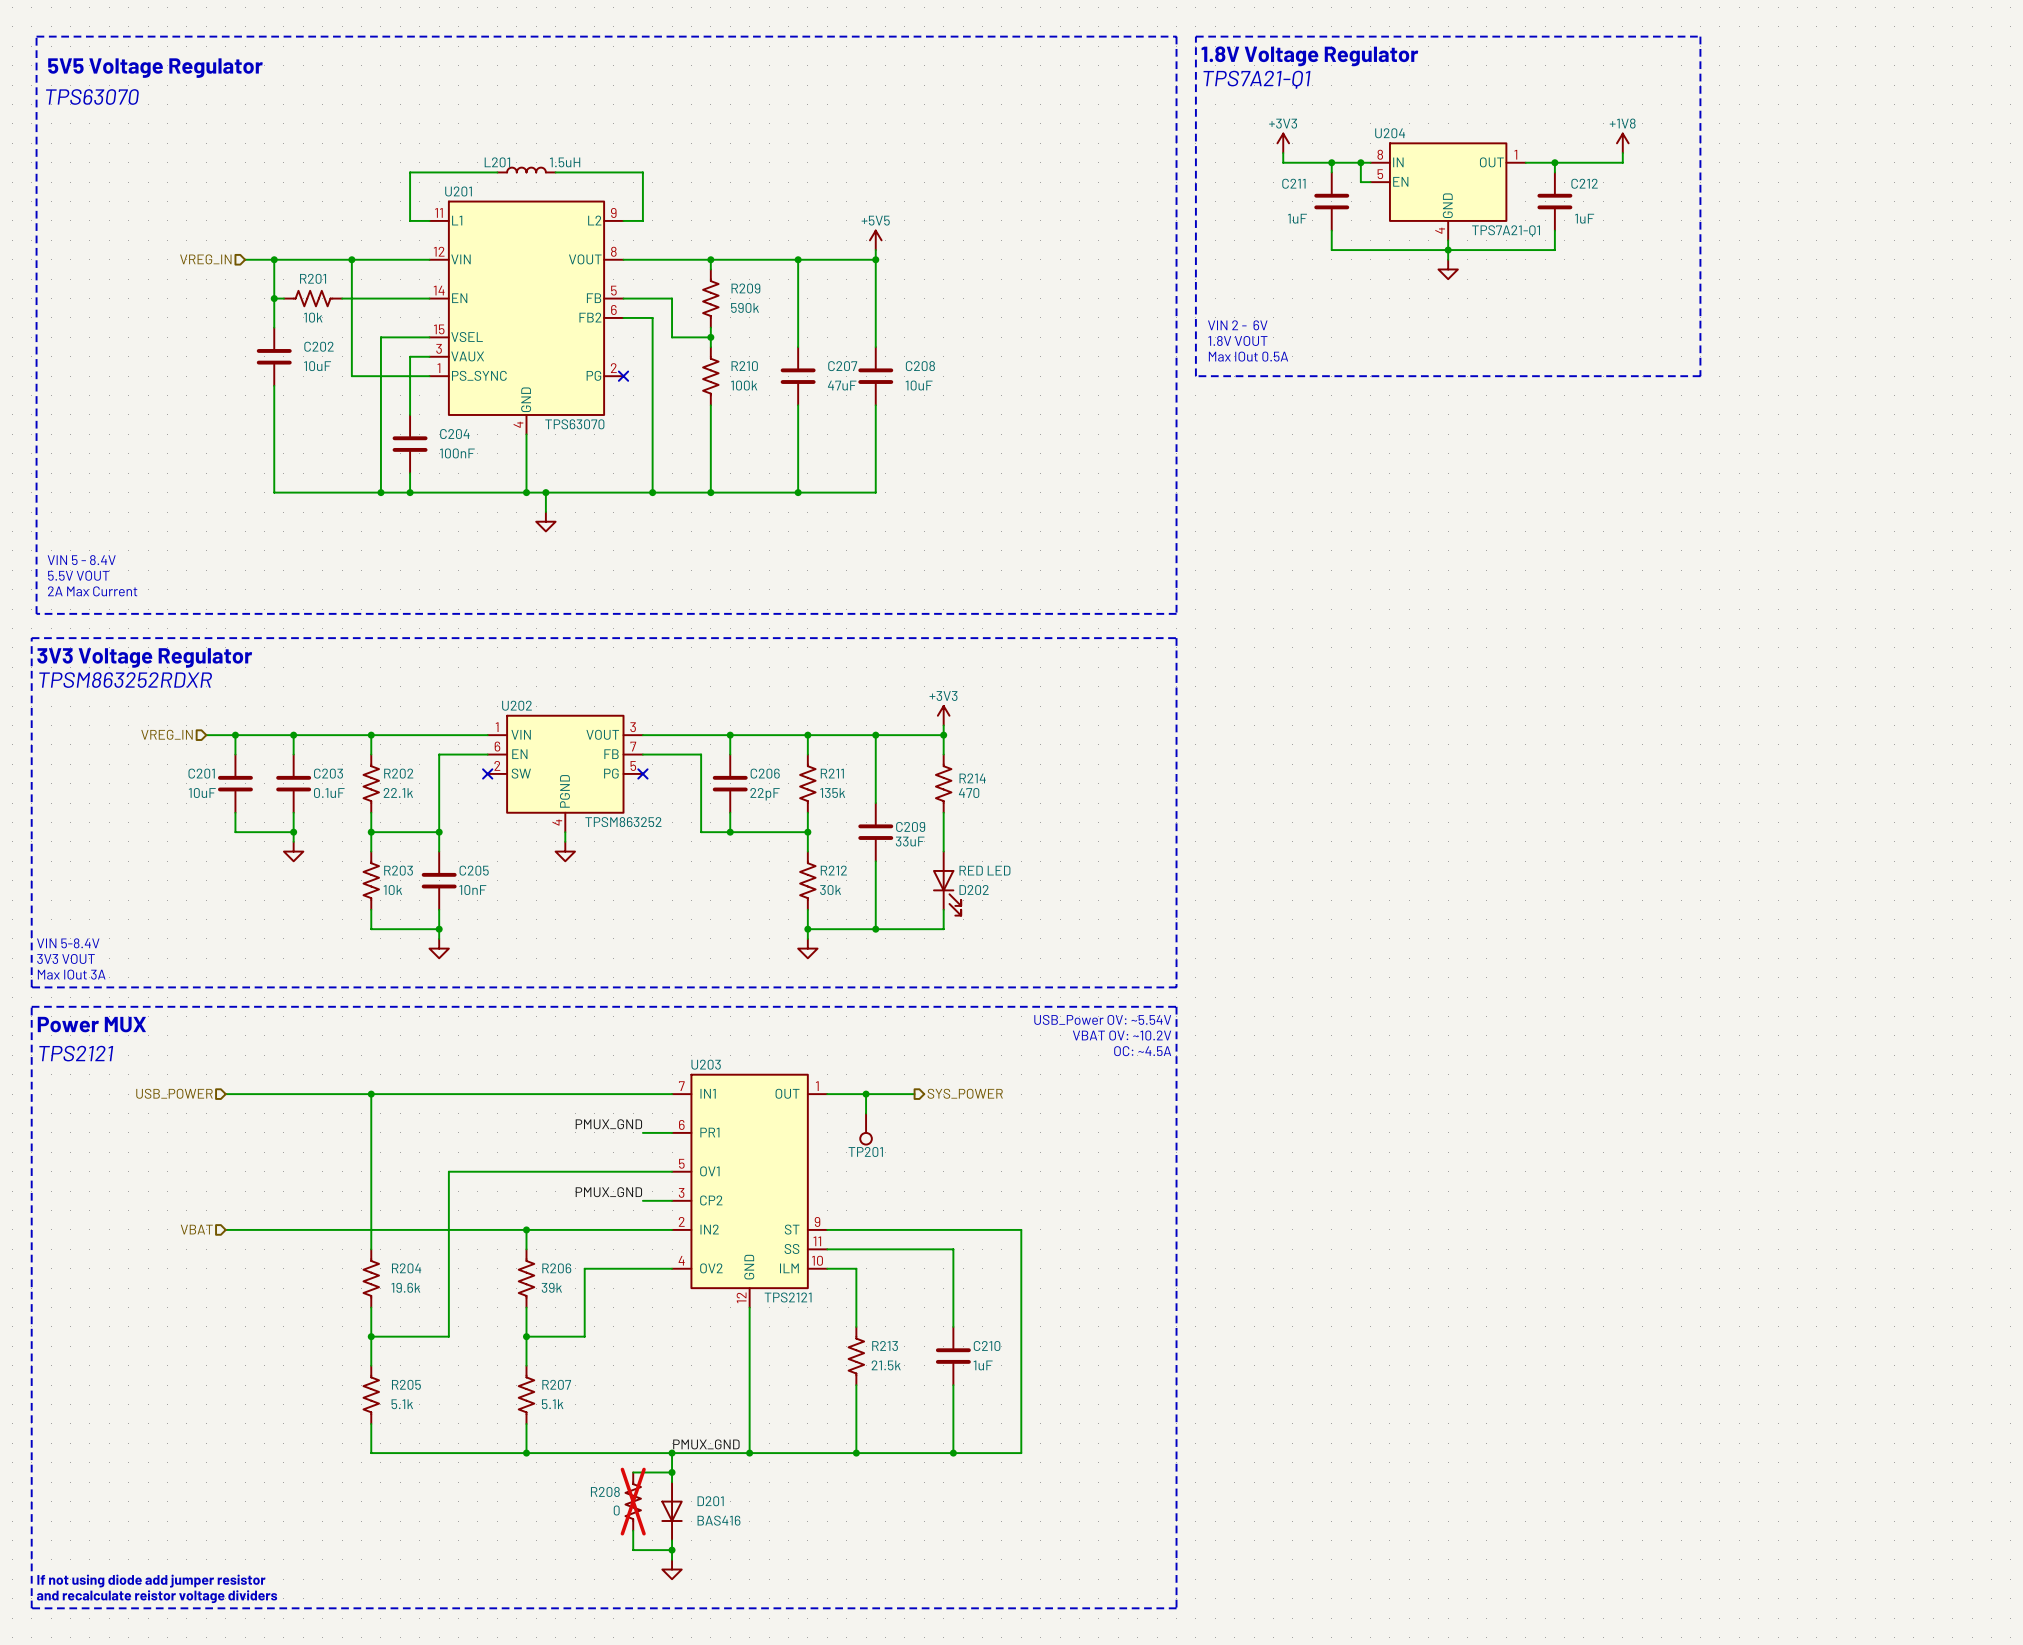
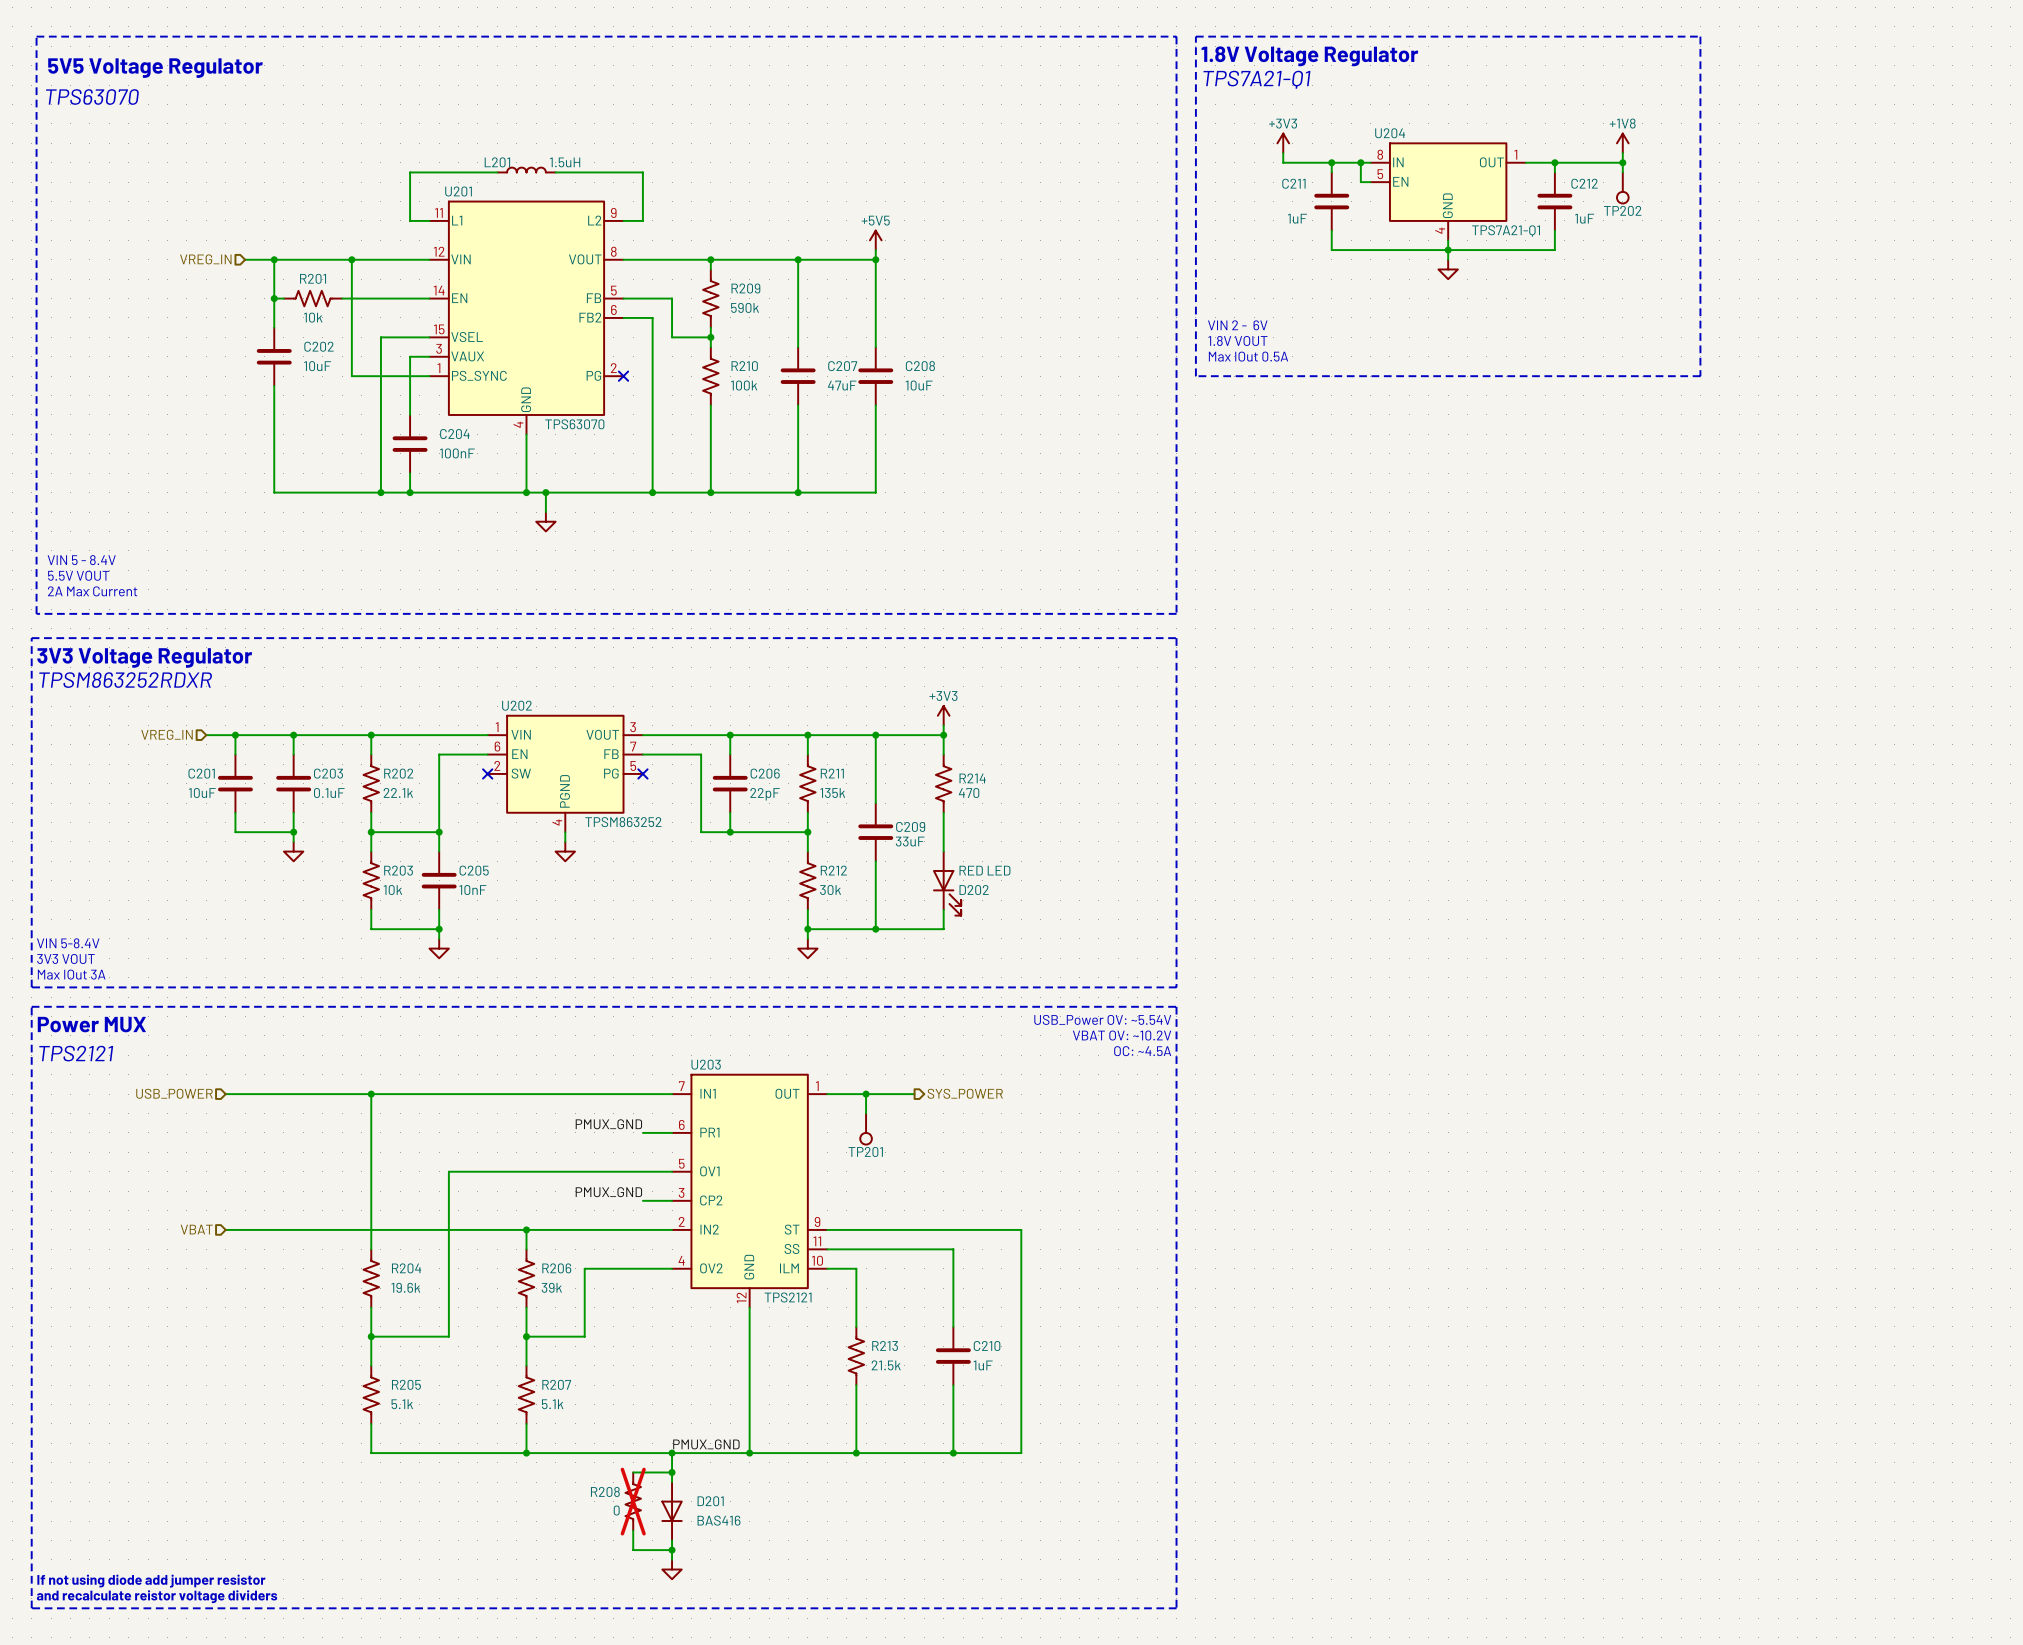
wire: none -> (1622, 162) (1622, 172)
junction: none -> (1622, 162)
TP202: none -> (1622, 187)

